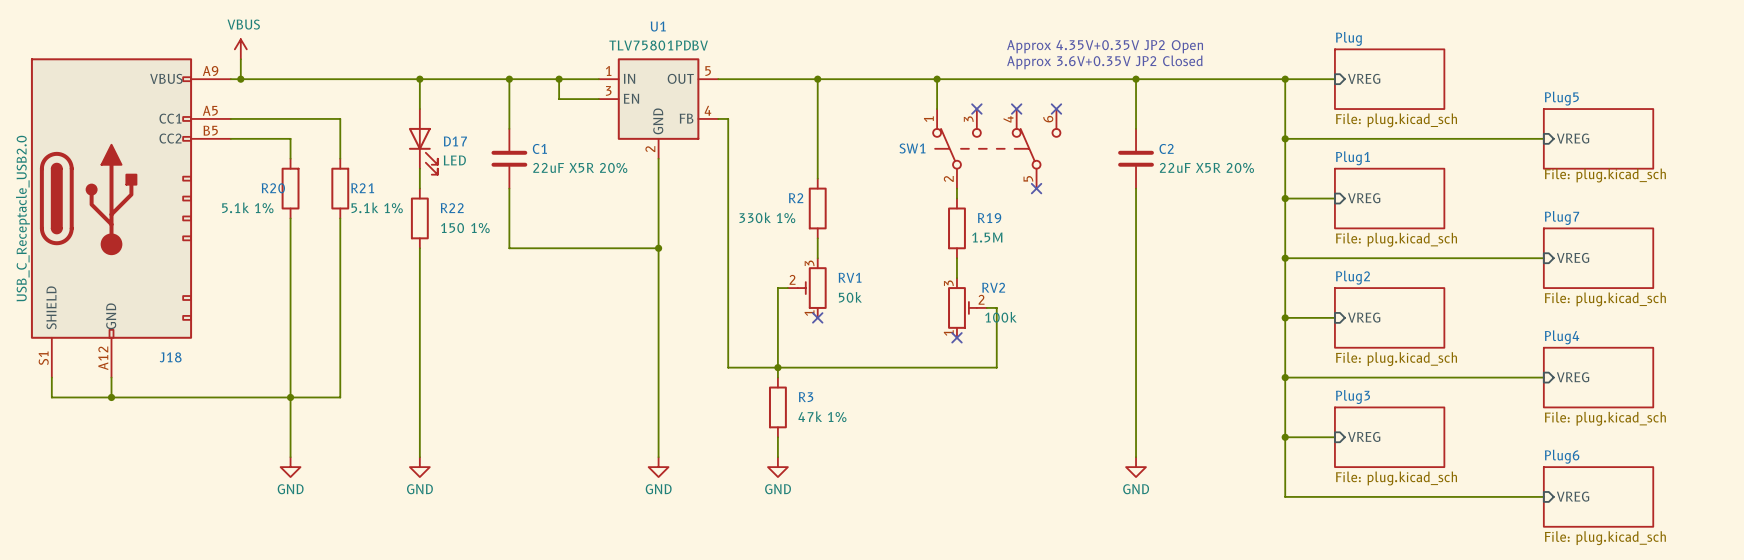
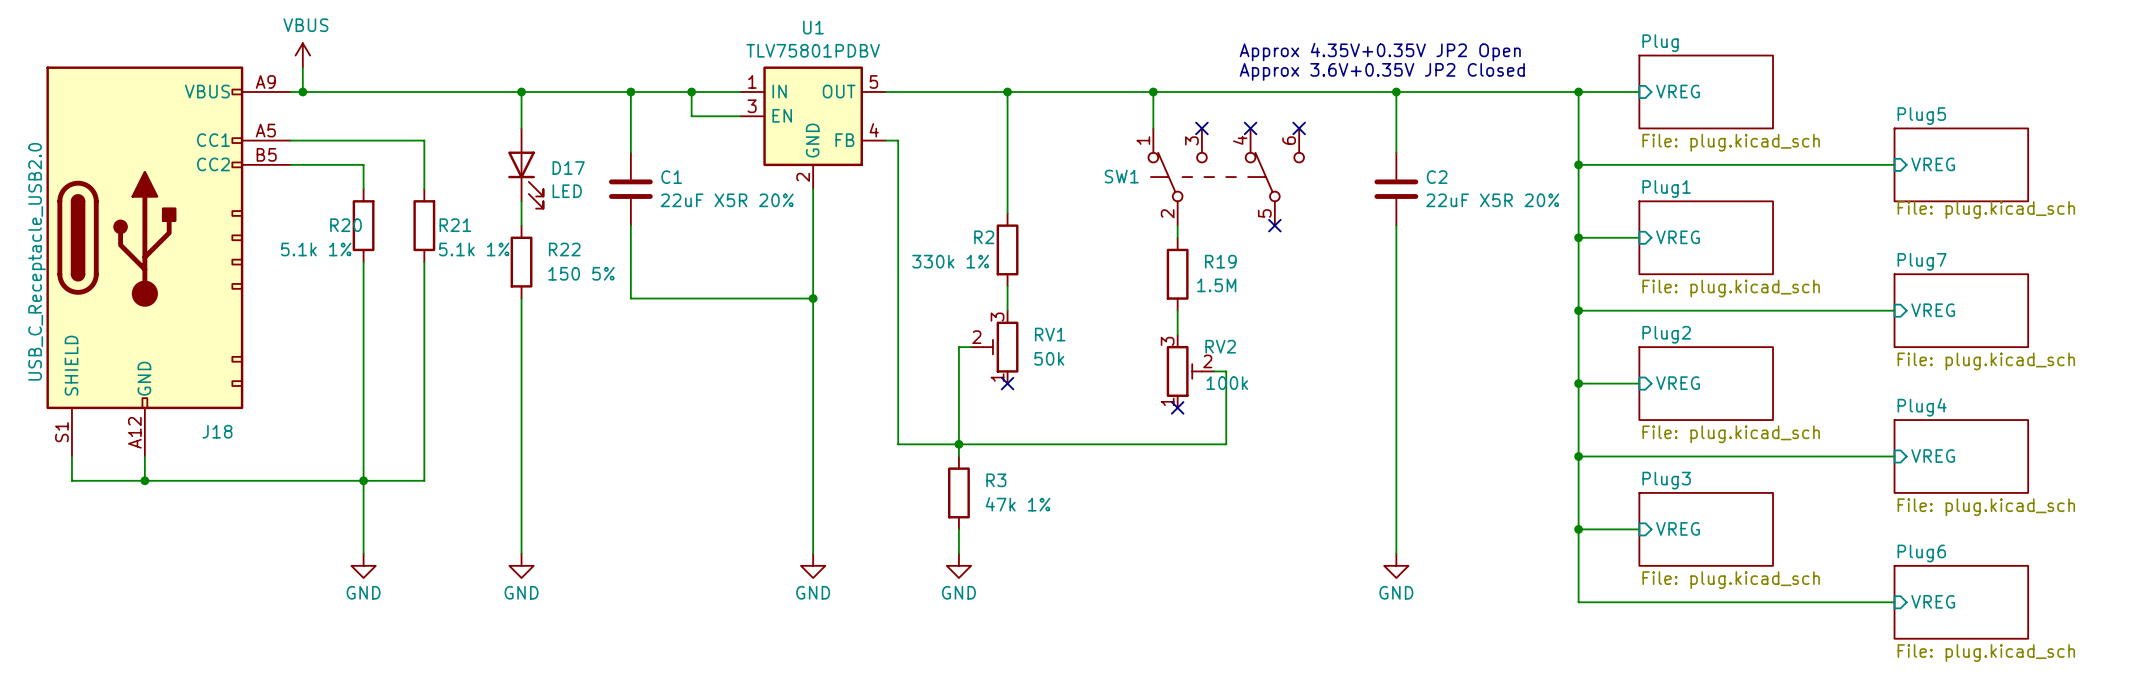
R22 value: 150 1% (465, 228) -> 150 5% (581, 273)

